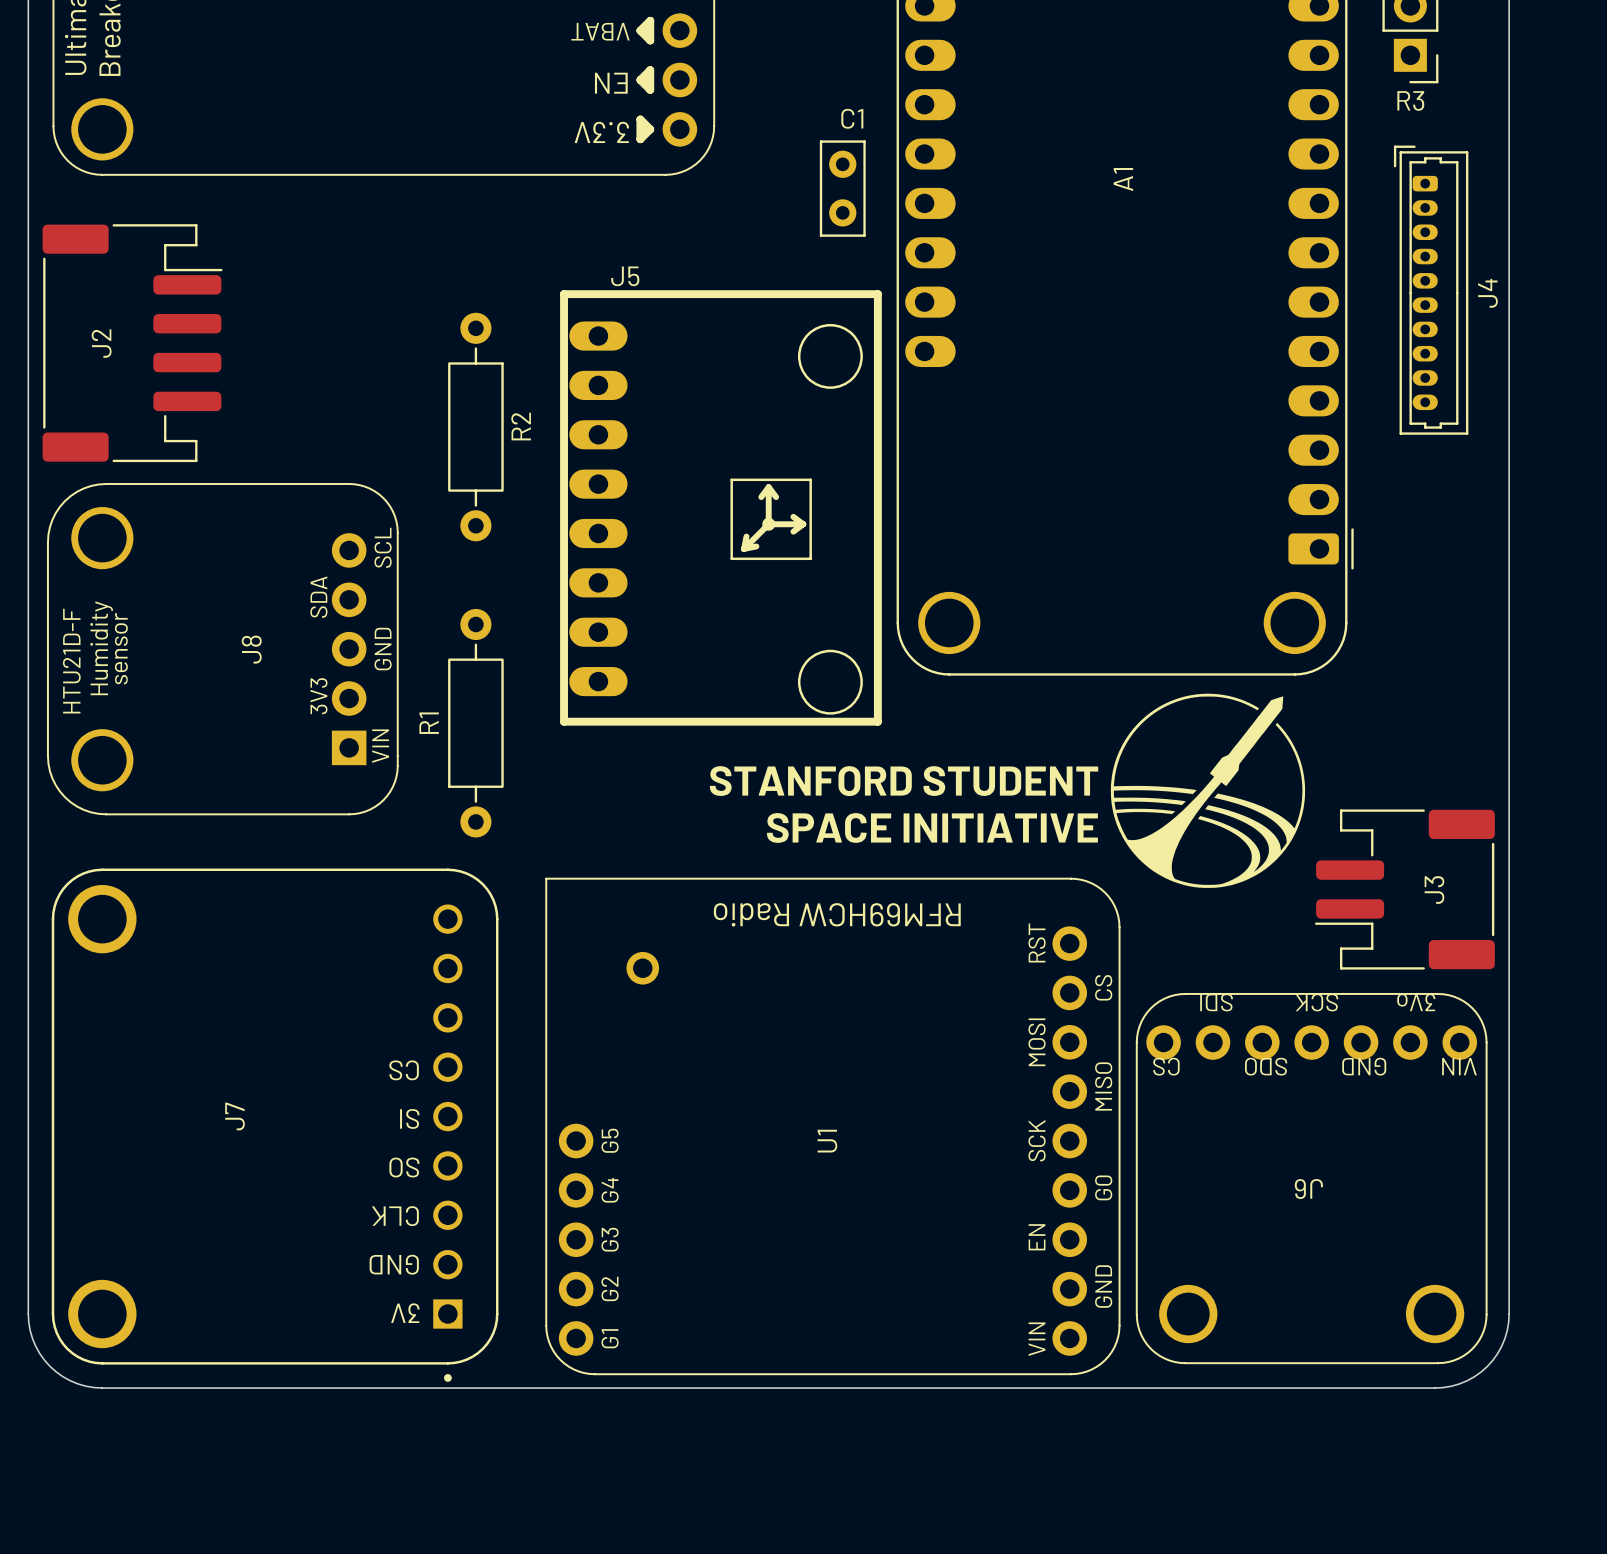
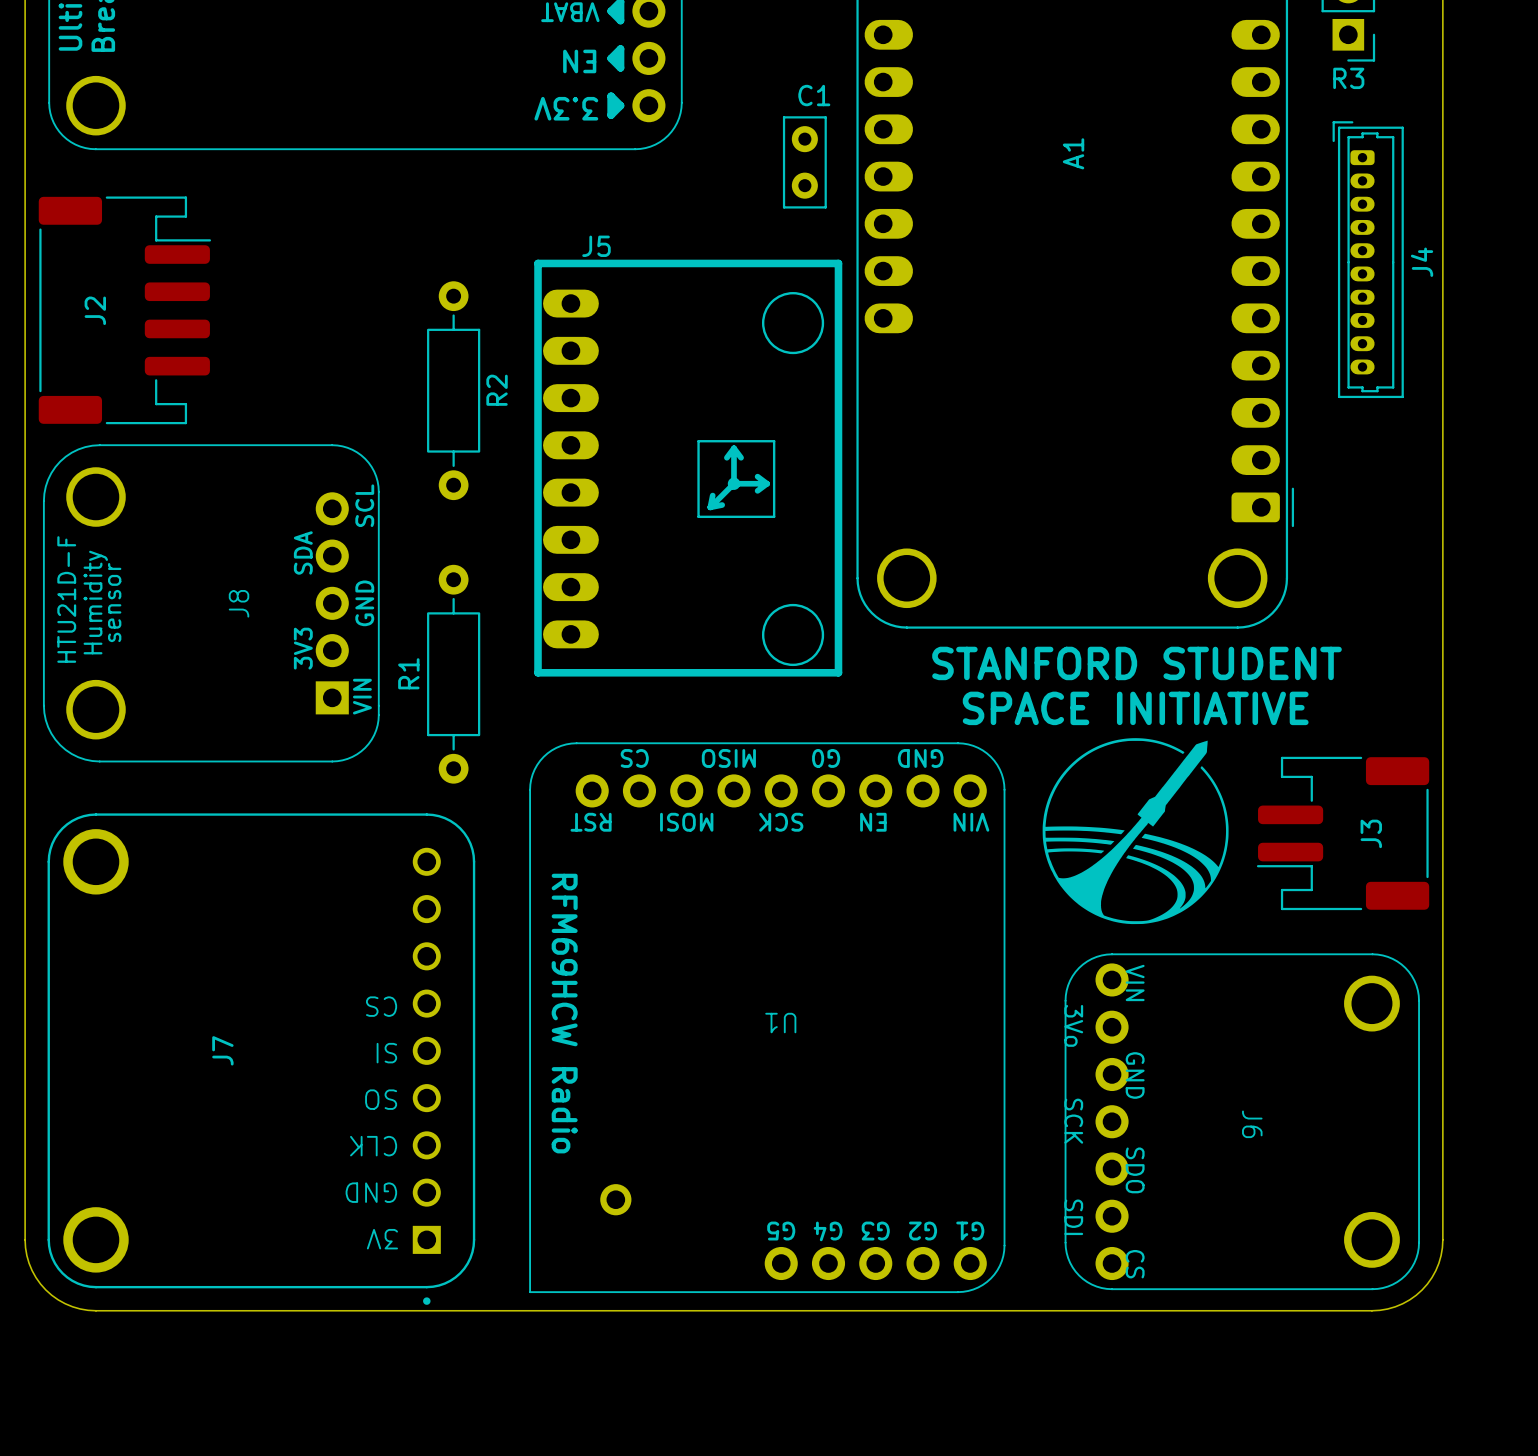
text position: STANFORD STUDENT (904, 781) -> STANFORD STUDENT (1137, 663)
drawing position: (1207, 790) -> (1135, 831)
text position: SPACE INITIATIVE (932, 827) -> SPACE INITIATIVE (1135, 708)
U1 rotation: 0° (832, 1126) -> 90° counterclockwise (767, 1017)
J6 rotation: 0° (1311, 1178) -> 90° counterclockwise (1242, 1121)

